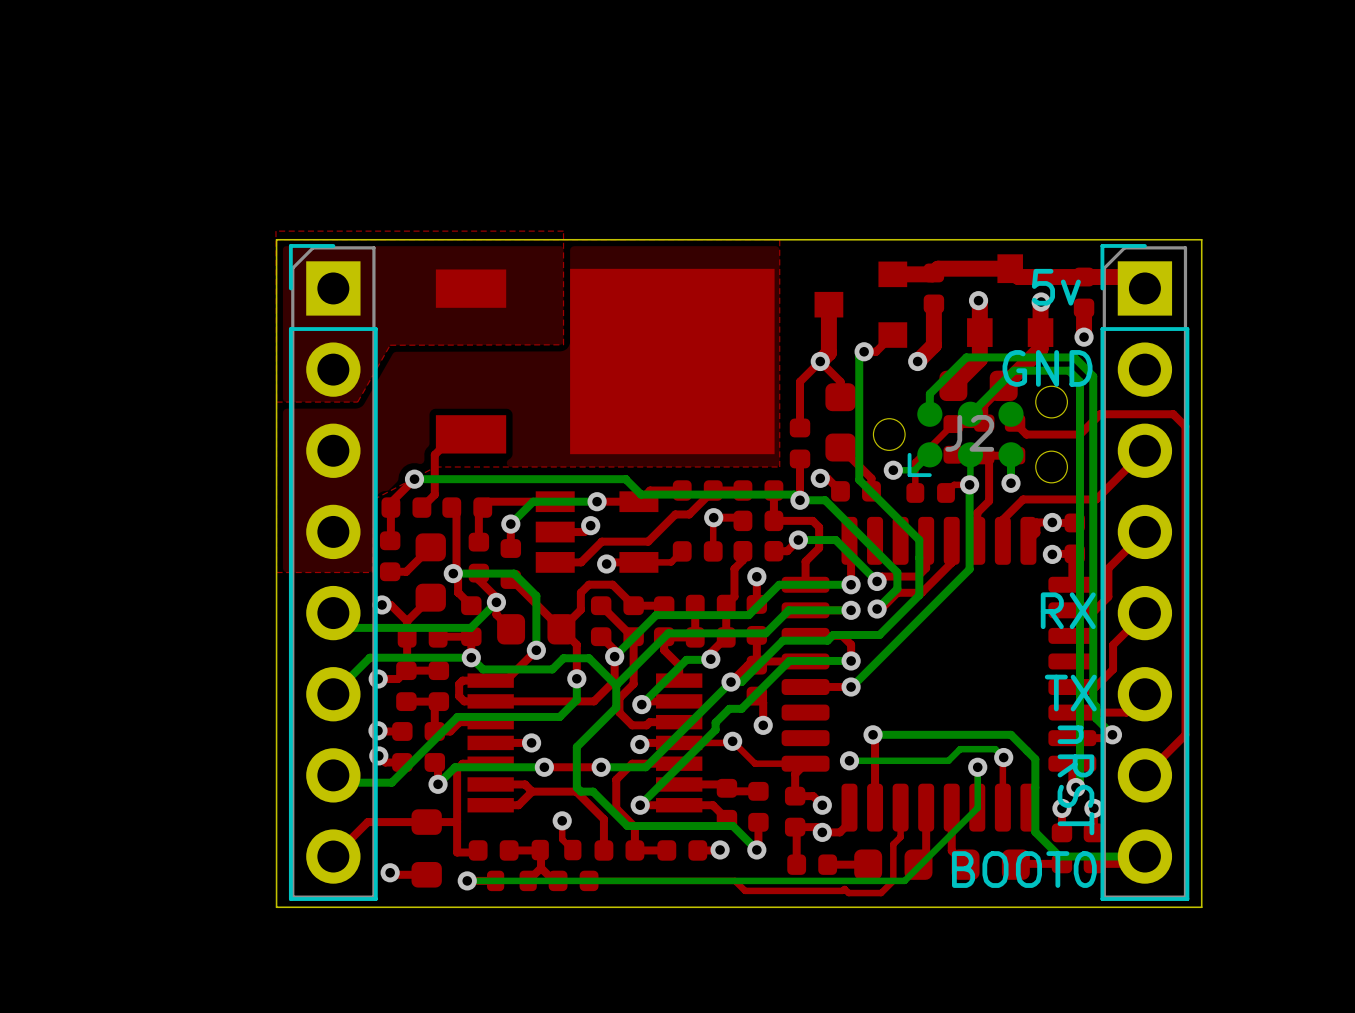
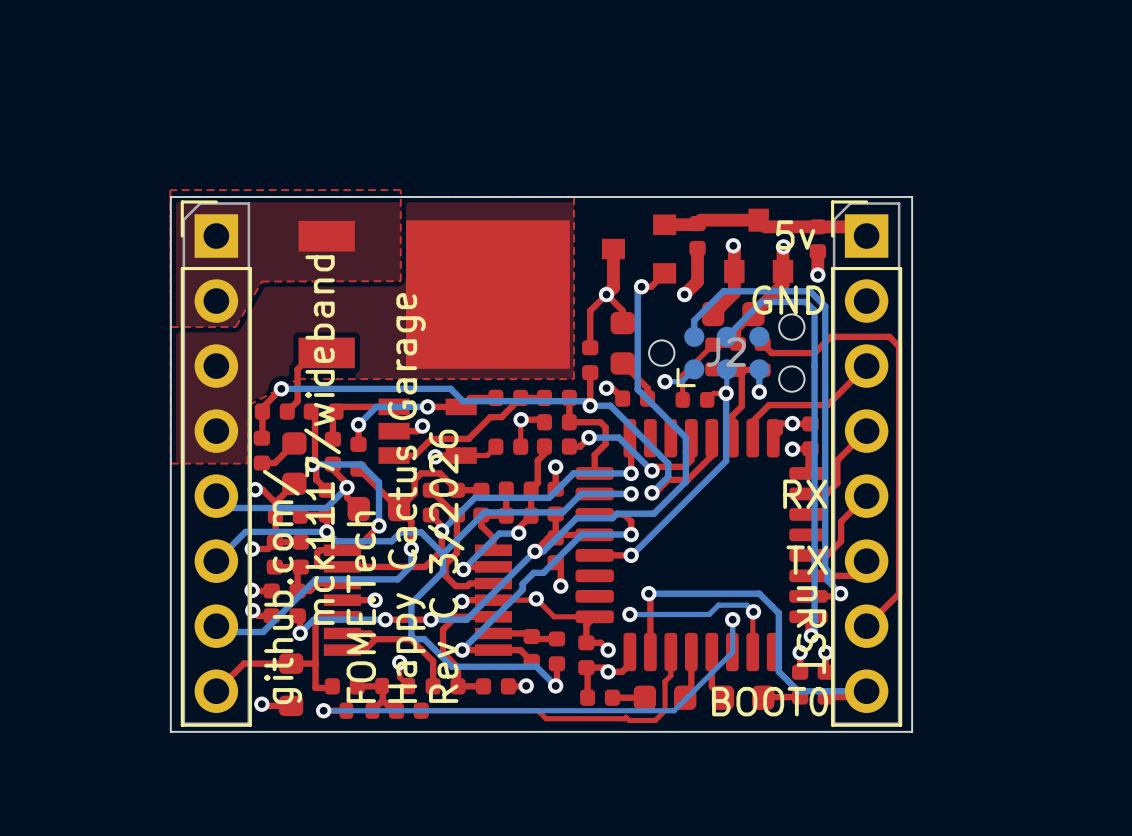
text: none -> mck1117/wideband (322, 440)
text: none -> Happy Cactus Garage (406, 498)
text: none -> Rev C 3/2026 (446, 566)
text: none -> github.com/ (282, 587)
text: none -> FOME.Tech (361, 607)

